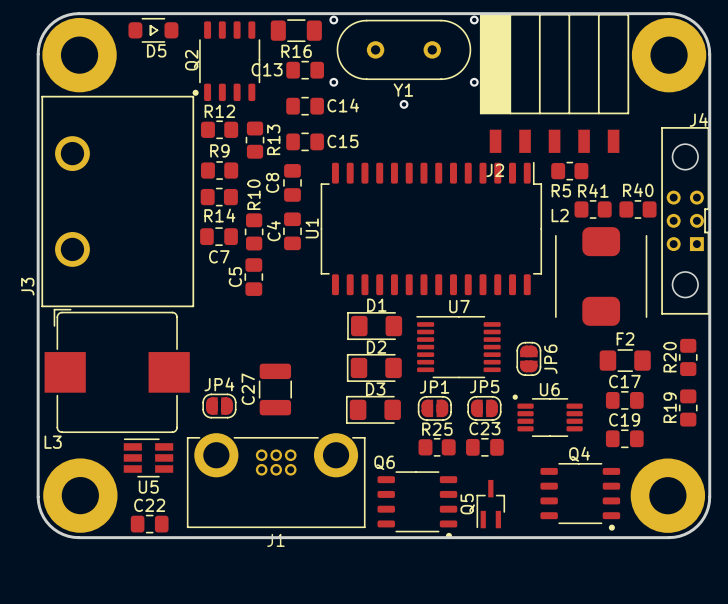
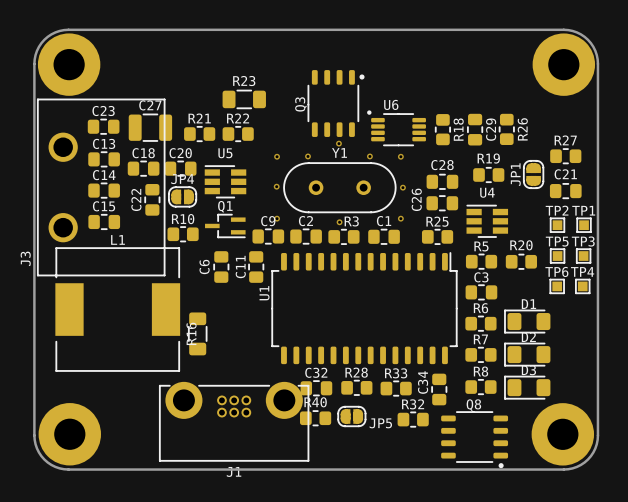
via: (333, 20) -> none
via: (474, 20) -> none
D5: (153, 30) -> none
R16 rotation: 0° (296, 30) -> 90° clockwise (197, 333)
R16 position: (296, 30) -> (197, 333)
Y1 position: (403, 49) -> (339, 187)
Q2: (226, 61) -> none
C13 name position: C13 (267, 69) -> C13 (104, 143)
C13 position: (305, 70) -> (104, 159)
via: (333, 82) -> none
via: (474, 82) -> none
J2: (554, 83) -> none
Y1 name position: Y1 (403, 90) -> Y1 (339, 152)
R23: none -> (244, 99)
Q3: none -> (336, 103)
via: (404, 104) -> none
C14 name position: C14 (343, 105) -> C14 (104, 175)
C14 position: (305, 106) -> (104, 190)
R12: (219, 129) -> none
R18: none -> (442, 129)
C29: none -> (475, 129)
R26: none -> (506, 129)
R21: none -> (199, 134)
R22: none -> (238, 134)
R13: (255, 140) -> none
C15 position: (305, 141) -> (104, 221)
C15 name position: C15 (342, 141) -> C15 (104, 206)
via: none -> (338, 143)
via: none -> (277, 156)
via: none -> (308, 156)
via: none -> (369, 156)
via: none -> (400, 156)
R27: none -> (565, 156)
R9: (219, 170) -> none
R5 position: (569, 171) -> (481, 261)
C18: none -> (143, 168)
C20: none -> (180, 168)
C8: (292, 182) -> none
R5 name position: R5 (561, 190) -> R5 (481, 246)
C28: none -> (442, 181)
R14: (219, 197) -> none
via: none -> (276, 186)
via: none -> (402, 187)
C21: none -> (565, 191)
R41: (593, 209) -> none
R40 position: (637, 209) -> (315, 418)
C26: none -> (442, 203)
J4: (685, 220) -> none
U1 name position: U1 (312, 228) -> U1 (264, 293)
U1 position: (431, 228) -> (364, 308)
R10 rotation: 0° (254, 231) -> 90° clockwise (183, 234)
R10 position: (254, 231) -> (183, 234)
C4: (292, 231) -> none
C7: (219, 236) -> none
via: none -> (277, 218)
via: none -> (400, 218)
U4: none -> (487, 221)
via: none -> (339, 222)
TP2: none -> (557, 225)
TP1: none -> (584, 225)
Q1: none -> (225, 226)
C9: none -> (268, 236)
C2: none -> (306, 236)
R3: none -> (343, 236)
C1: none -> (384, 236)
L2: (601, 276) -> none
C5: (253, 277) -> none
TP5: none -> (557, 256)
TP3: none -> (583, 256)
C6: none -> (221, 267)
C11: none -> (256, 267)
TP6: none -> (557, 286)
TP4: none -> (582, 286)
D1 position: (374, 326) -> (527, 321)
C3: none -> (481, 292)
L1: none -> (117, 309)
U7: (458, 347) -> none
R20 rotation: 0° (688, 357) -> 90° clockwise (521, 261)
R20 position: (688, 357) -> (521, 261)
JP6: (528, 358) -> none
F2: (625, 360) -> none
R6: none -> (480, 323)
D2 position: (374, 367) -> (527, 354)
L3: (117, 370) -> none
JP5 name position: JP5 (484, 386) -> JP5 (380, 423)
JP1 name position: JP1 (434, 387) -> JP1 (515, 174)
C27 rotation: 0° (275, 389) -> 90° clockwise (150, 127)
C27 position: (275, 389) -> (150, 127)
U6 name position: U6 (549, 389) -> U6 (391, 104)
C17: (624, 400) -> none
R7: none -> (480, 354)
JP4 position: (219, 406) -> (182, 196)
R19 rotation: 0° (688, 407) -> 90° clockwise (488, 174)
R19 position: (688, 407) -> (488, 174)
JP1 rotation: 0° (434, 408) -> 90° clockwise (533, 174)
JP1 position: (434, 408) -> (533, 174)
JP5 position: (484, 408) -> (351, 416)
D3 position: (373, 409) -> (527, 387)
U6 position: (547, 415) -> (396, 128)
C19: (624, 438) -> none
R8: none -> (480, 387)
C32: none -> (316, 388)
R28: none -> (356, 387)
R33: none -> (396, 388)
C34: none -> (439, 389)
R25 position: (437, 447) -> (437, 236)
C23 position: (484, 447) -> (103, 126)
U5 position: (148, 457) -> (225, 181)
R32: none -> (413, 419)
U5 name position: U5 (148, 487) -> U5 (225, 153)
Q4: (580, 496) -> none
Q8: none -> (474, 439)
Q5: (490, 504) -> none
C22 name position: C22 (149, 505) -> C22 (136, 199)
Q6: (417, 505) -> none
C22 rotation: 0° (149, 524) -> 90° clockwise (152, 199)
C22 position: (149, 524) -> (152, 199)

